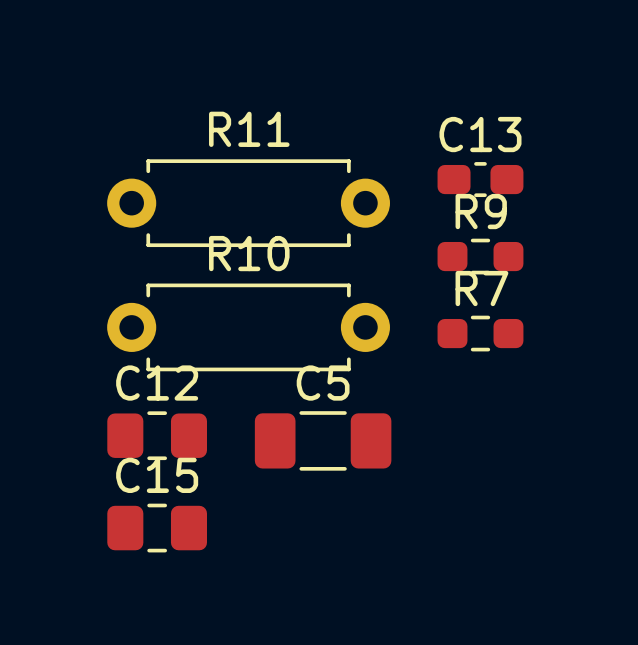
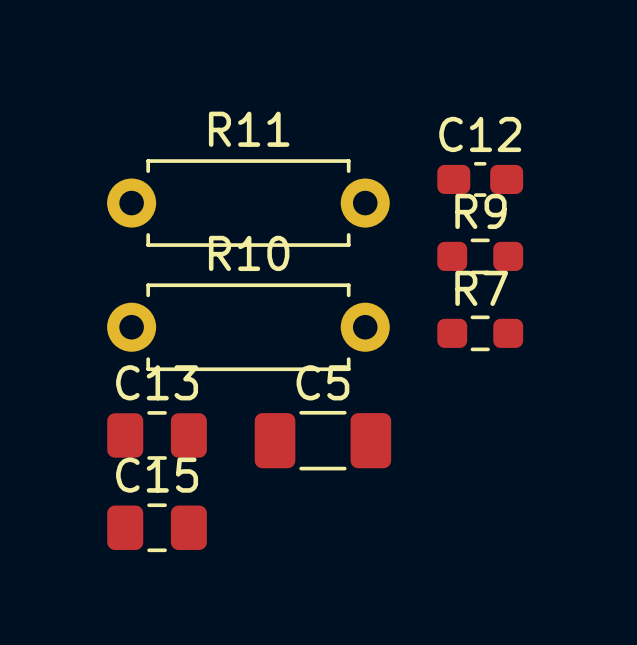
C13 name: C13 (480, 134) -> C12 (480, 134)
C12 name: C12 (157, 383) -> C13 (157, 382)

